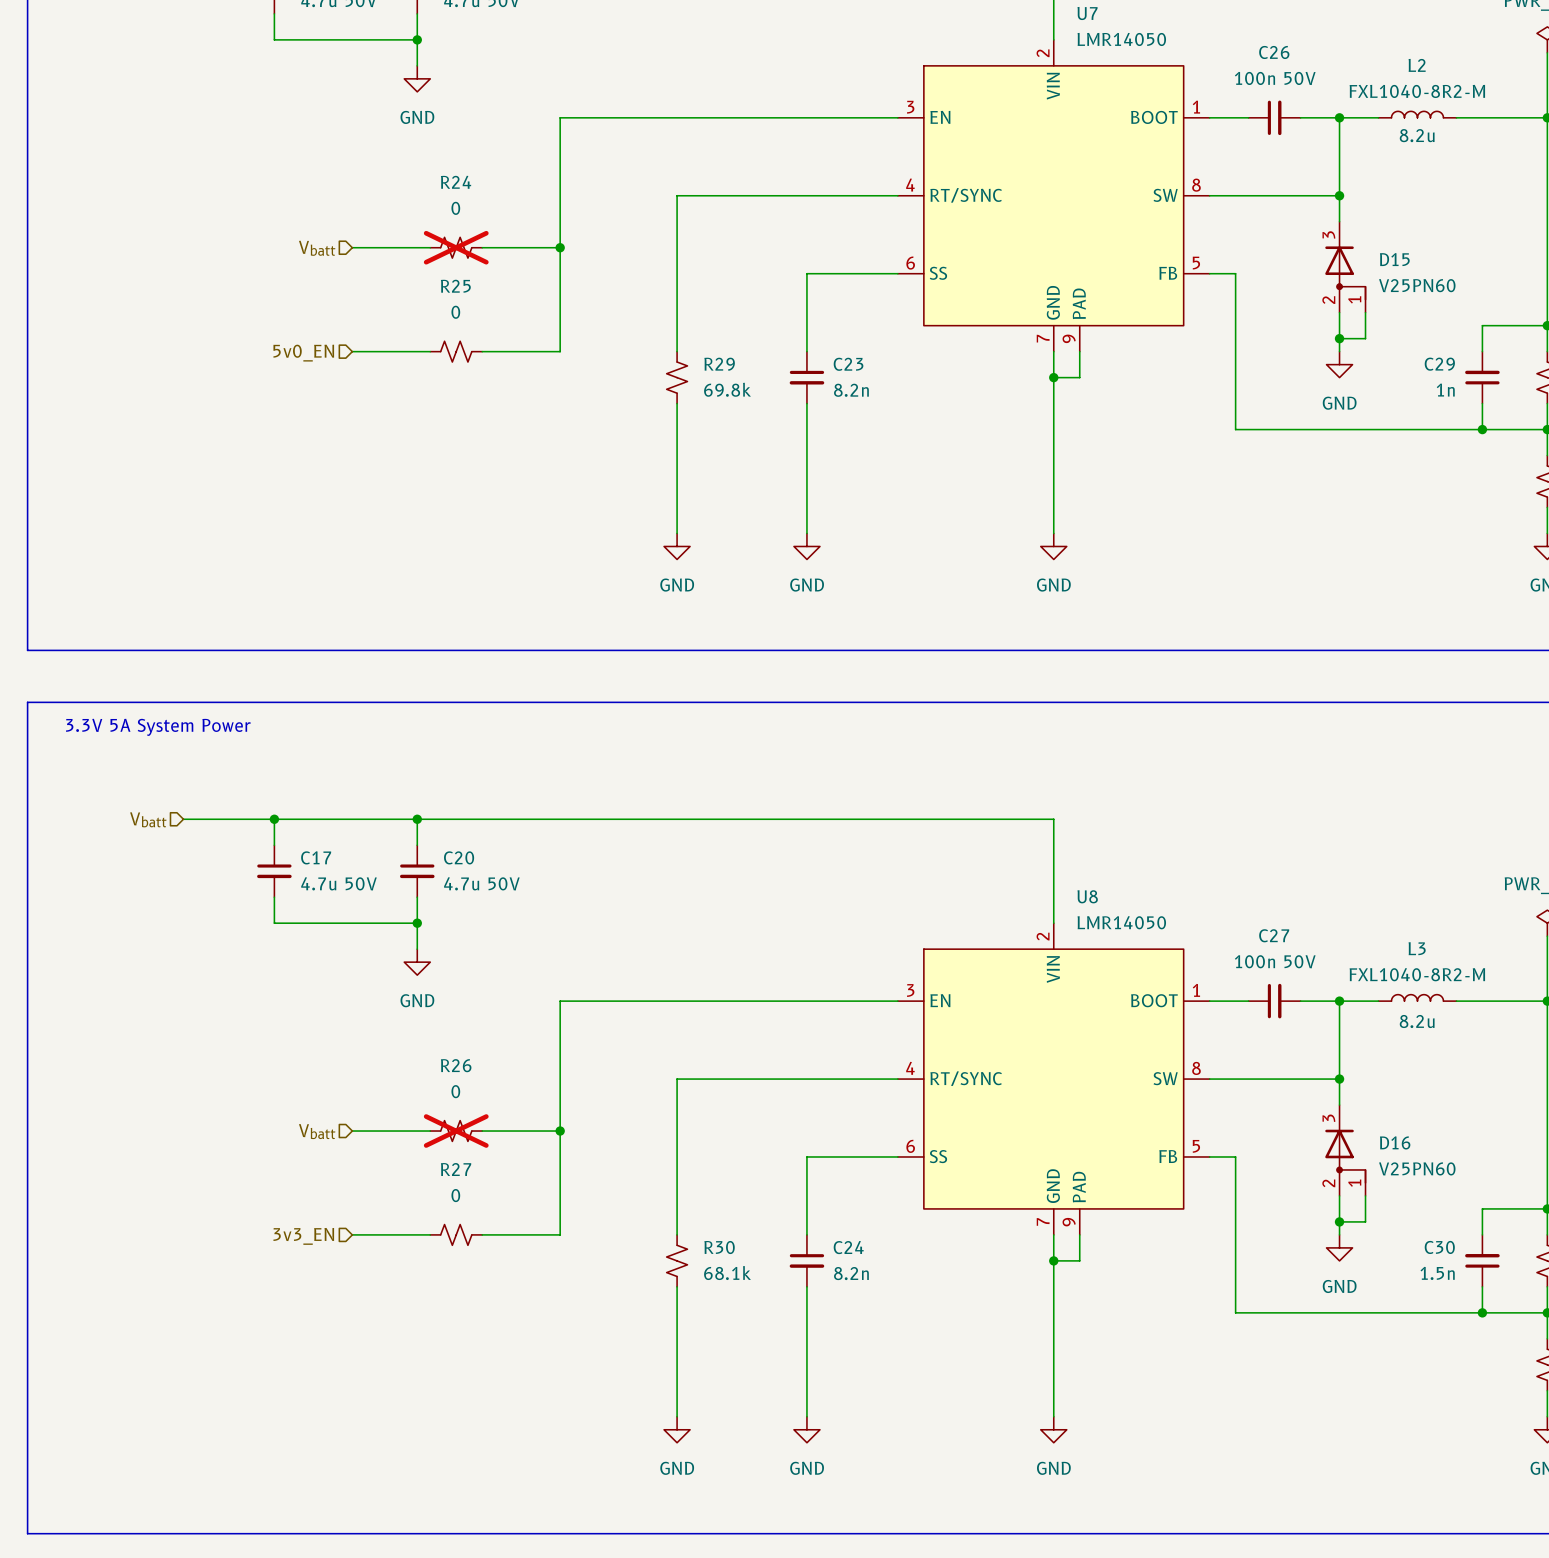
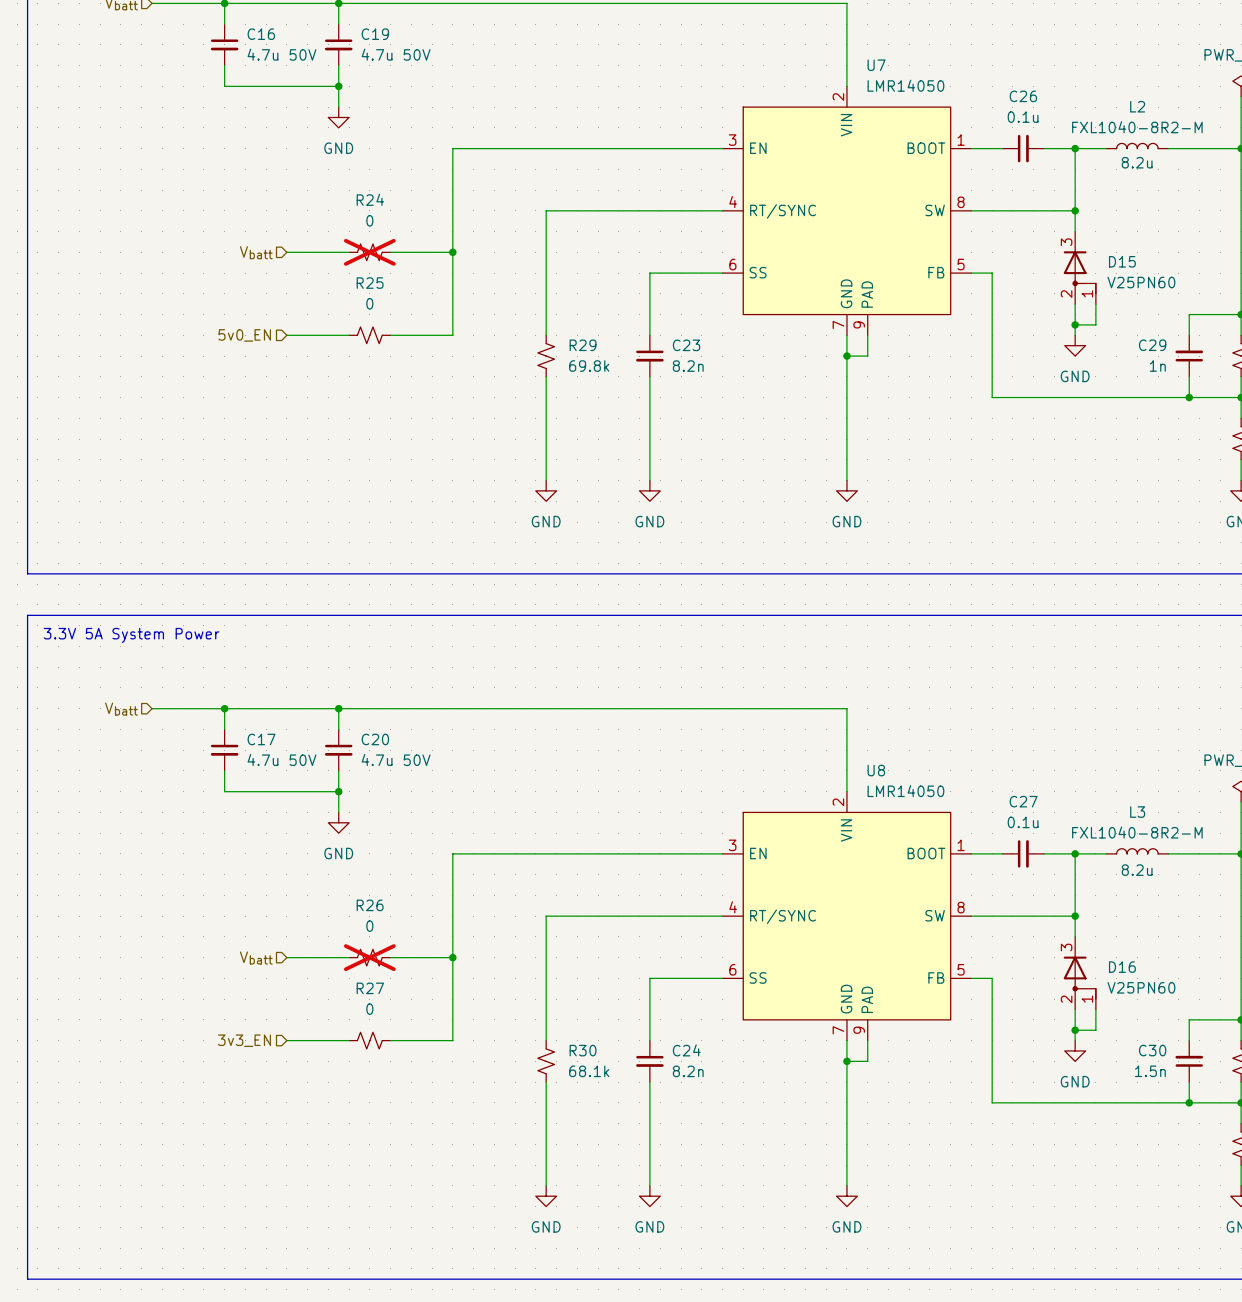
C26 value: 100n 50V (1275, 78) -> 0.1u (1023, 117)
C27 value: 100n 50V (1275, 961) -> 0.1u (1023, 822)

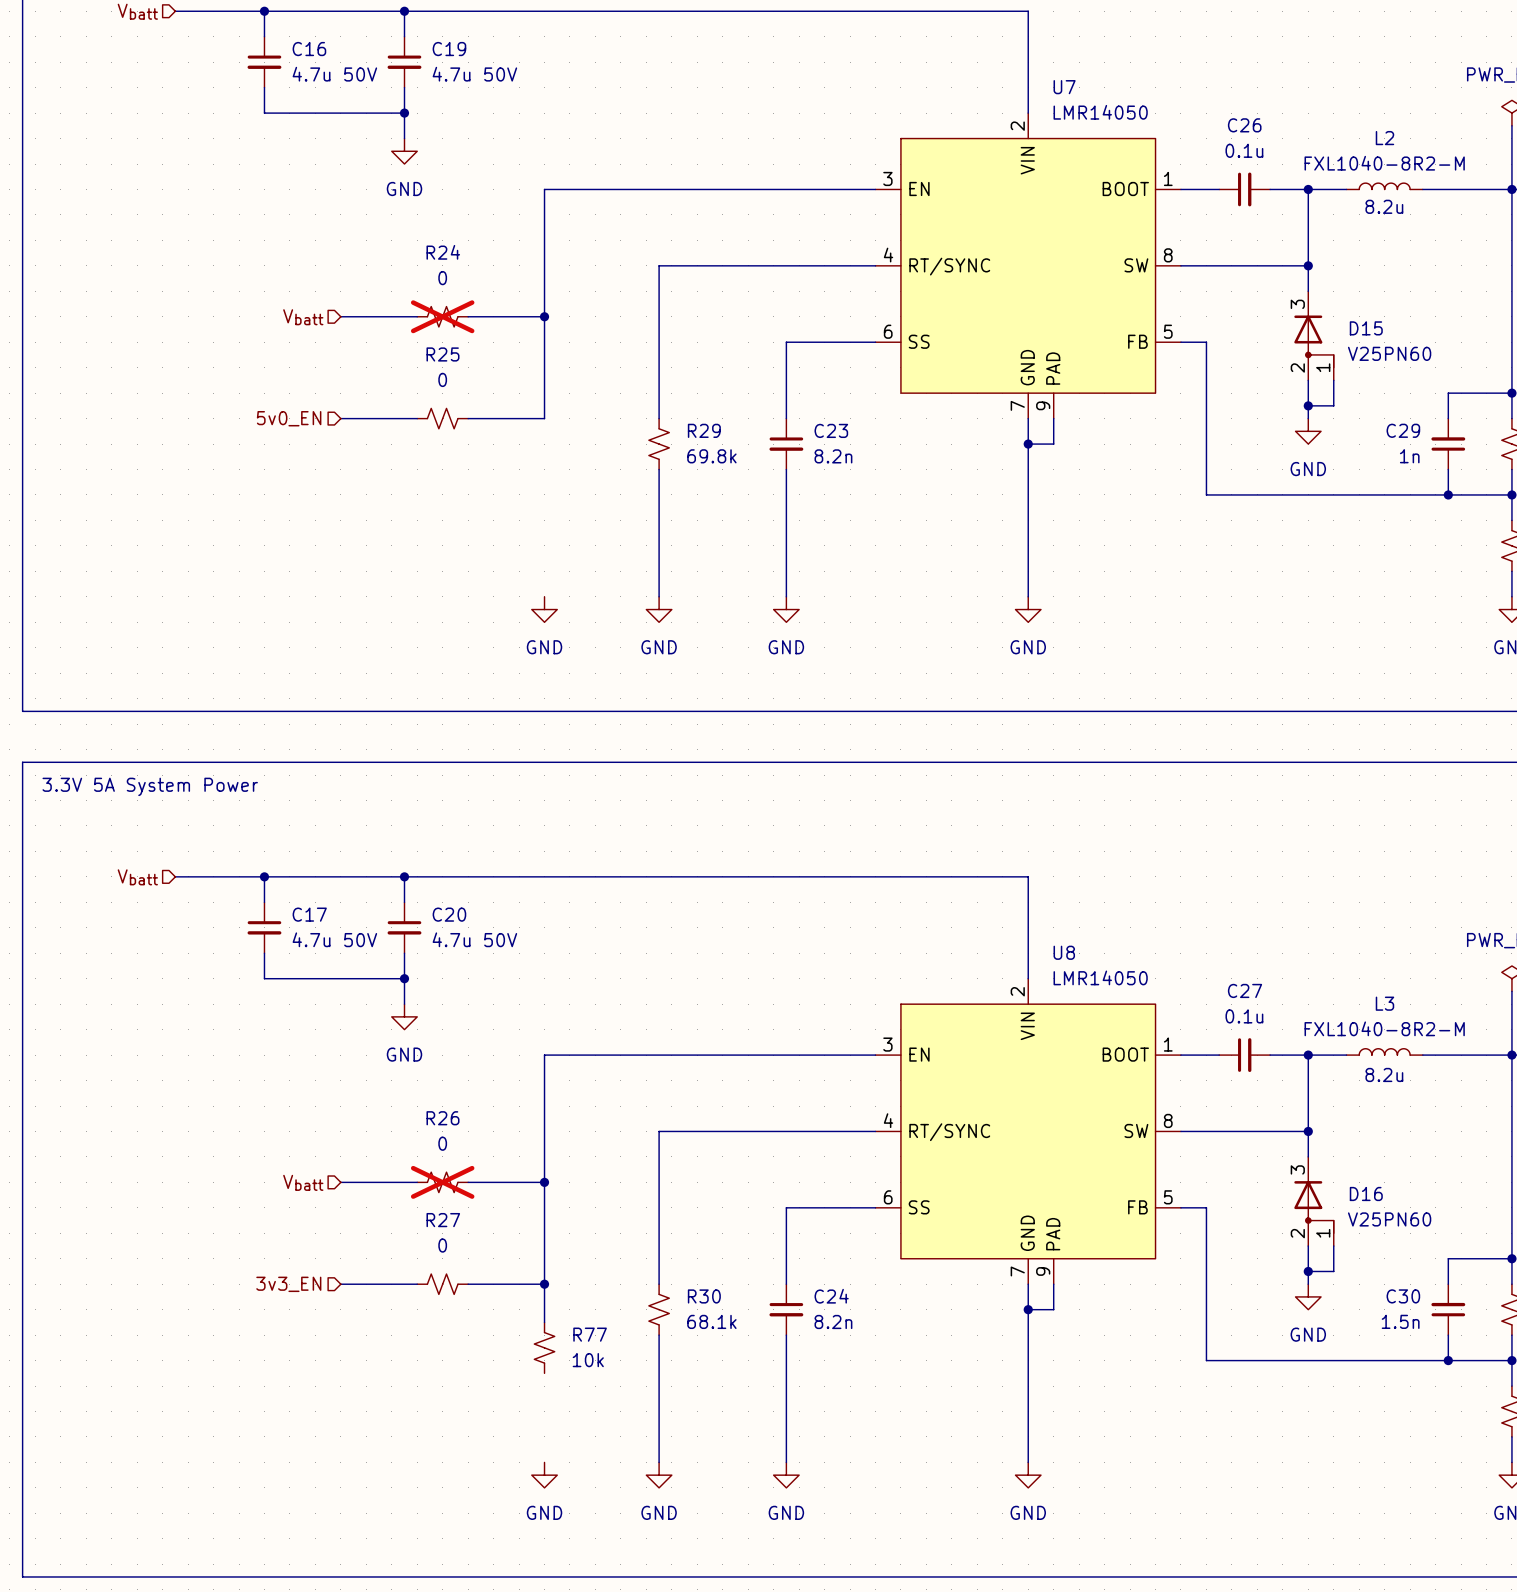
power symbol: none -> GND (544, 609)
wire: none -> (544, 1284) (544, 1322)
junction: none -> (544, 1284)
R77: none -> 10k (544, 1347)
power symbol: none -> GND (544, 1475)

